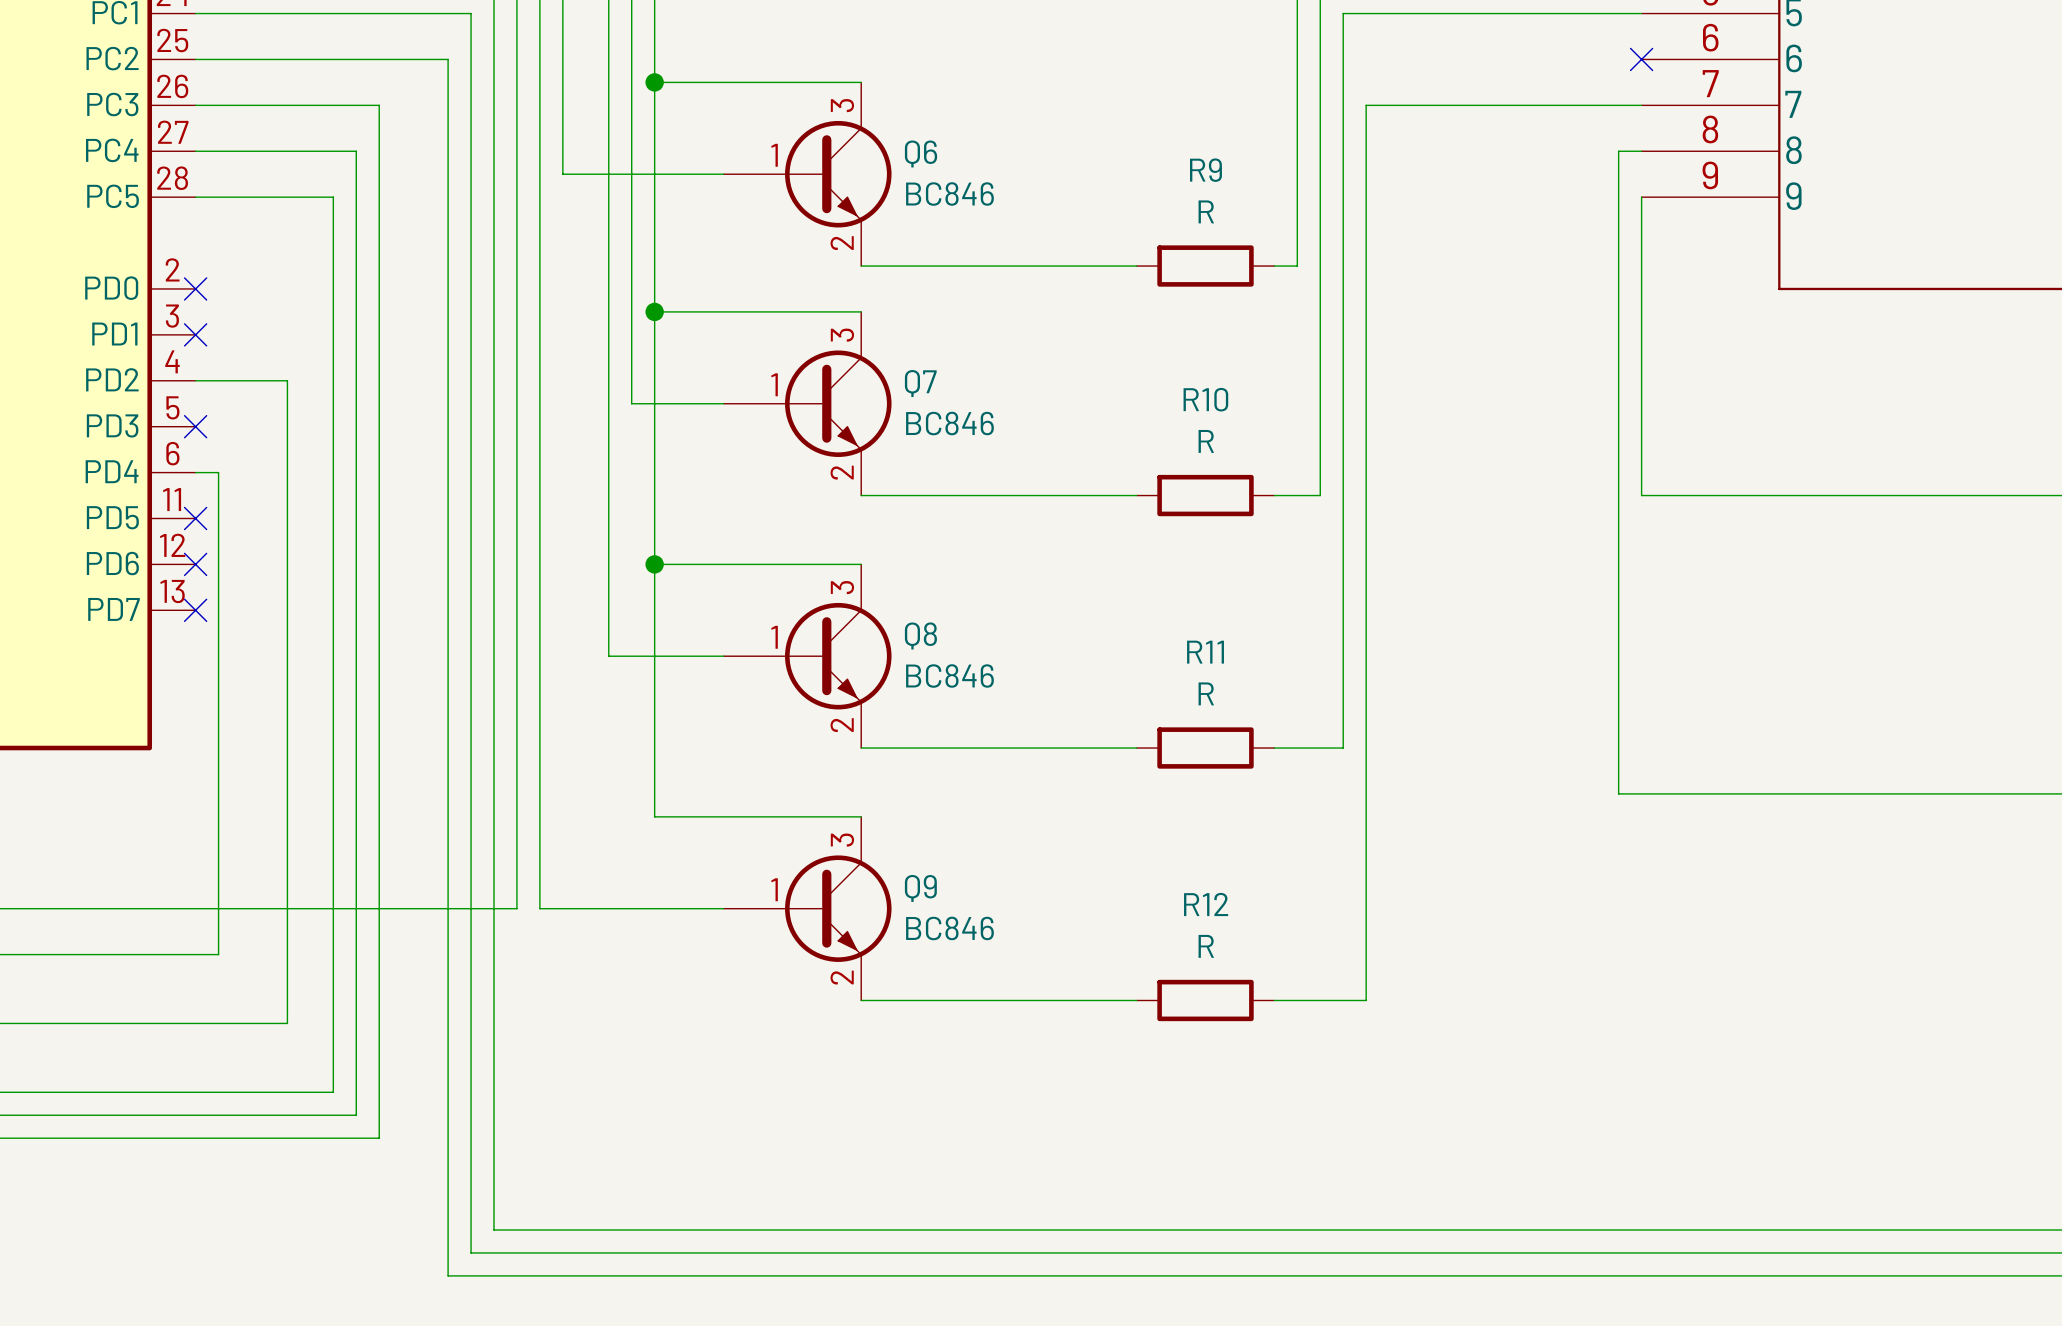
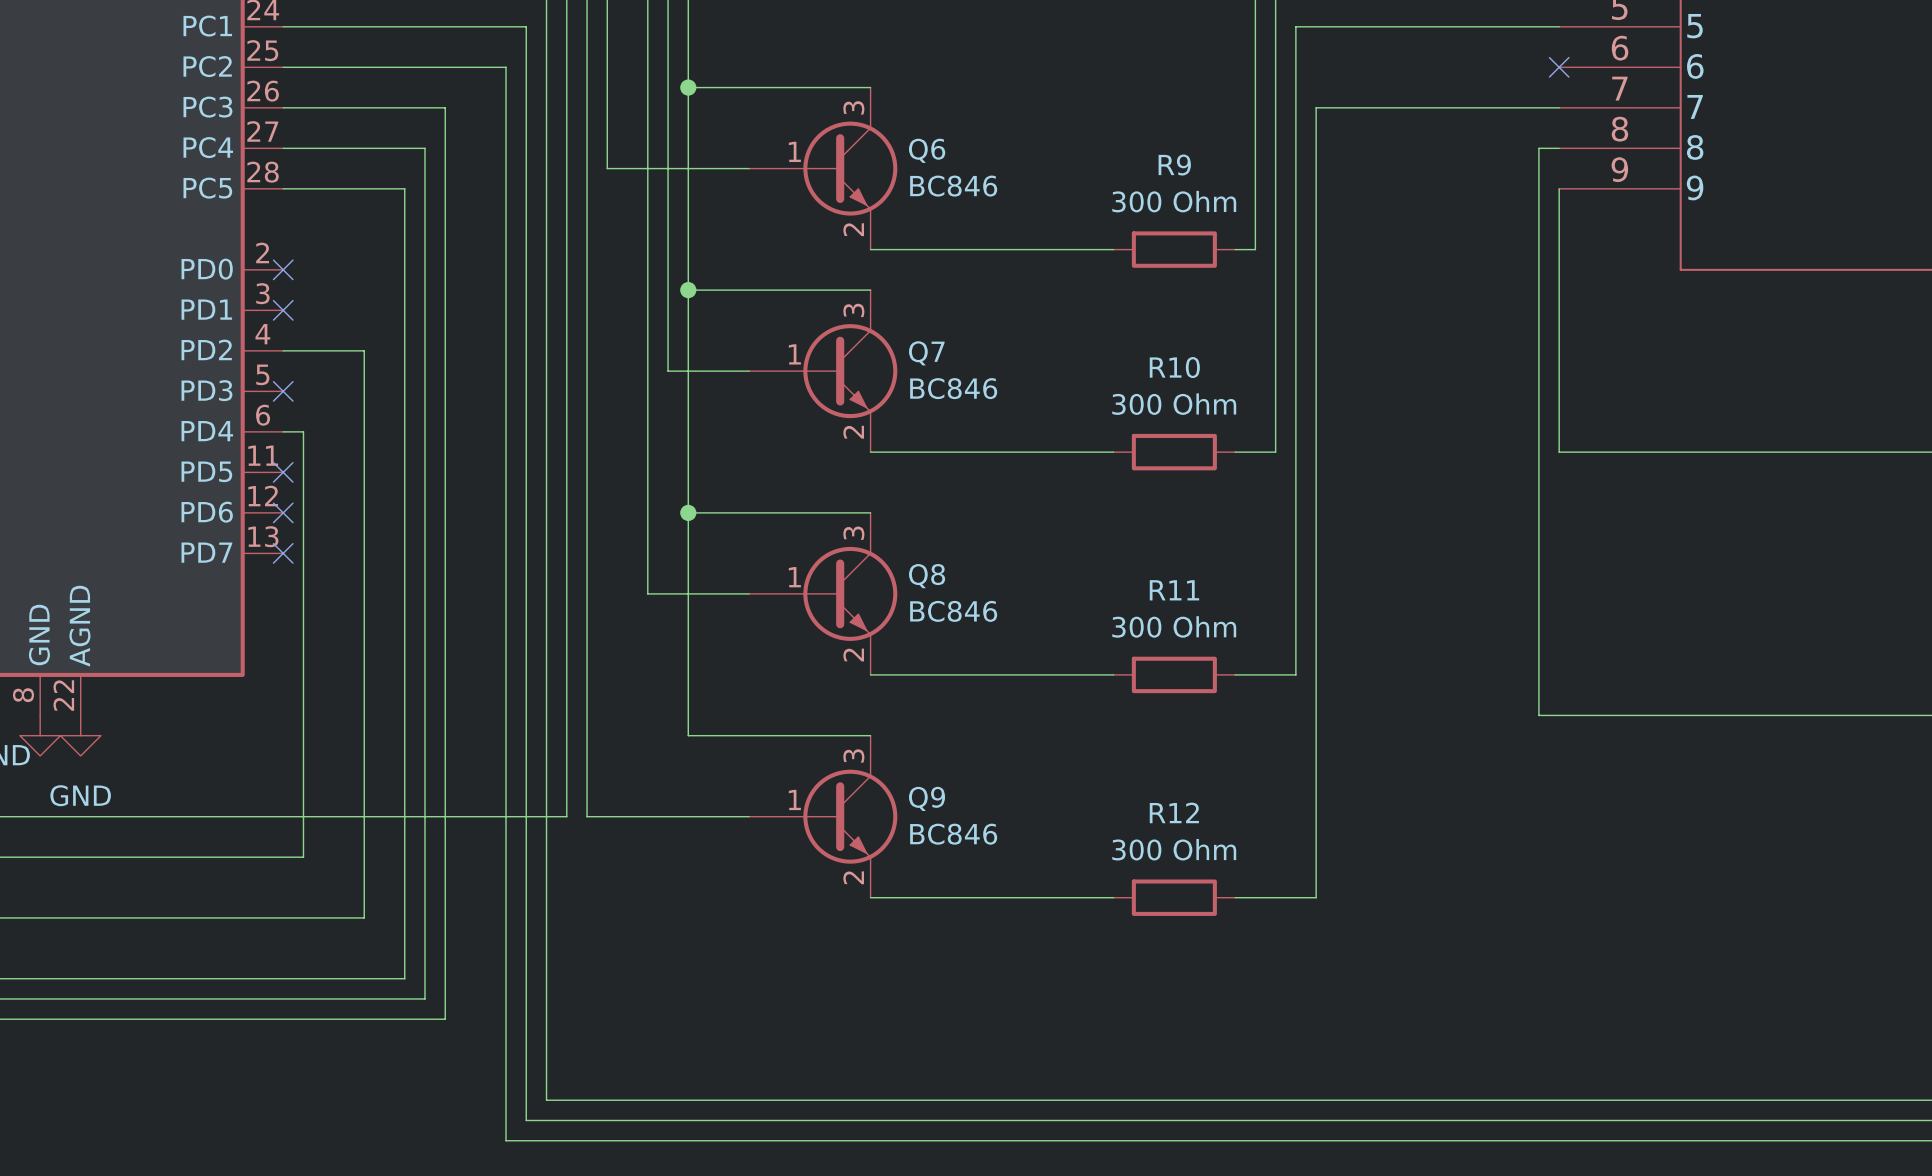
R9 value: R (1206, 211) -> 300 Ohm (1174, 201)
R10 value: R (1206, 441) -> 300 Ohm (1174, 404)
R11 value: R (1206, 693) -> 300 Ohm (1174, 626)
R12 value: R (1206, 946) -> 300 Ohm (1174, 849)

